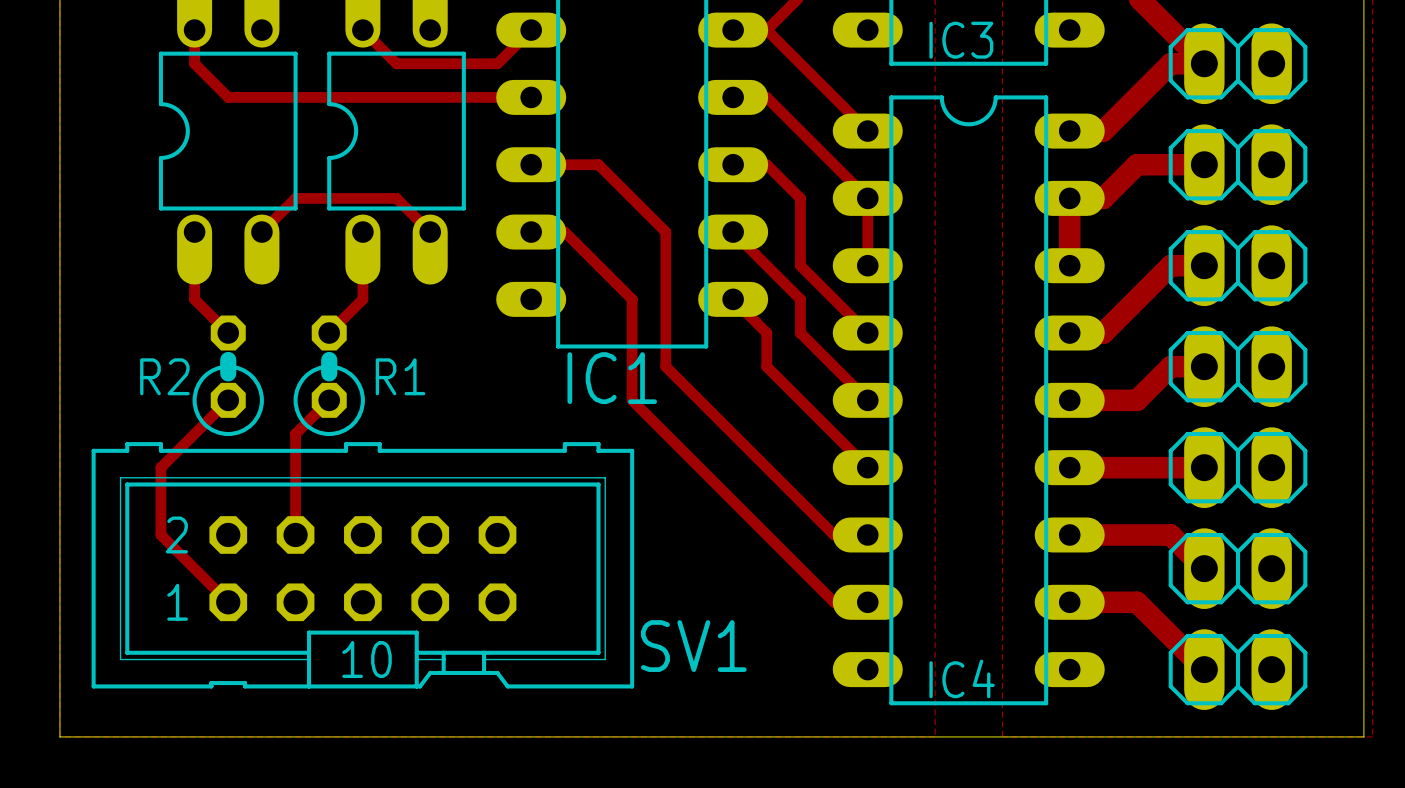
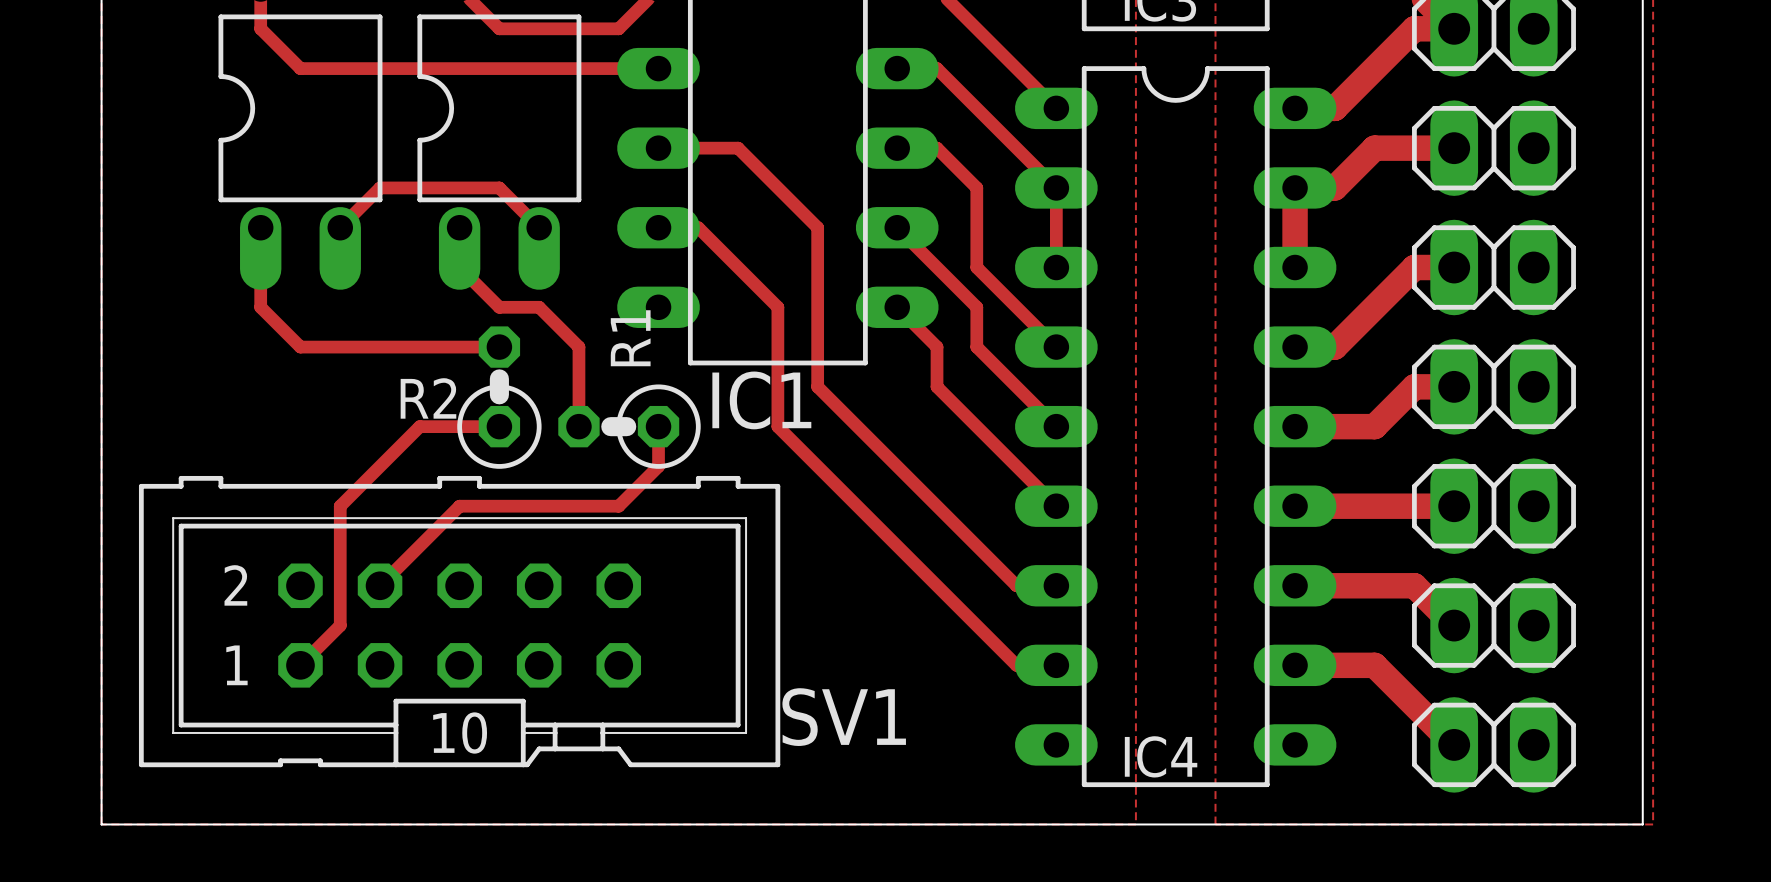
track: (362, 265) (362, 299) (329, 333) -> (459, 267) (499, 307) (539, 307) (578, 347) (578, 426)
track: none -> (300, 347) (499, 347)
R2 position: (228, 375) -> (499, 397)
R1 rotation: 0° (329, 375) -> 90° counterclockwise (629, 426)
R1 position: (329, 375) -> (629, 426)
track: (228, 400) (160, 467) (160, 534) (228, 602) -> (380, 466) (340, 506) (340, 625) (300, 665)
track: none -> (419, 426) (499, 426)
track: (295, 434) (295, 534) -> (658, 426) (658, 466) (618, 506) (459, 506) (380, 585)

